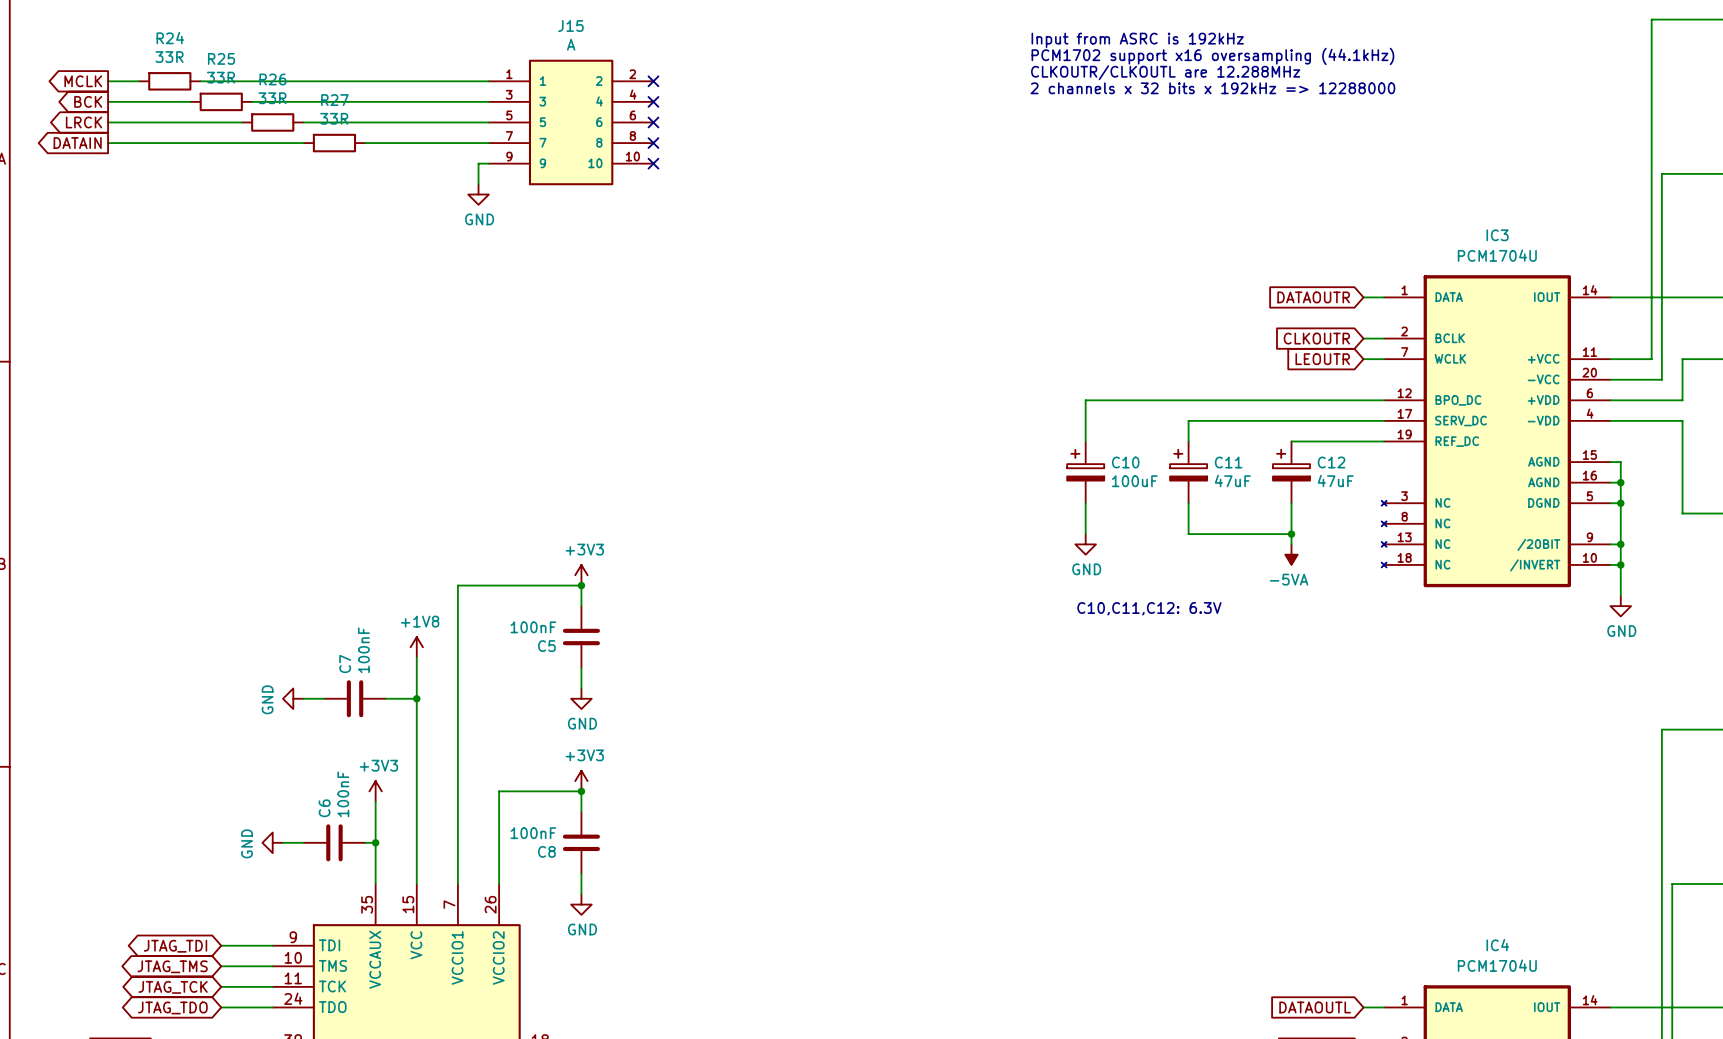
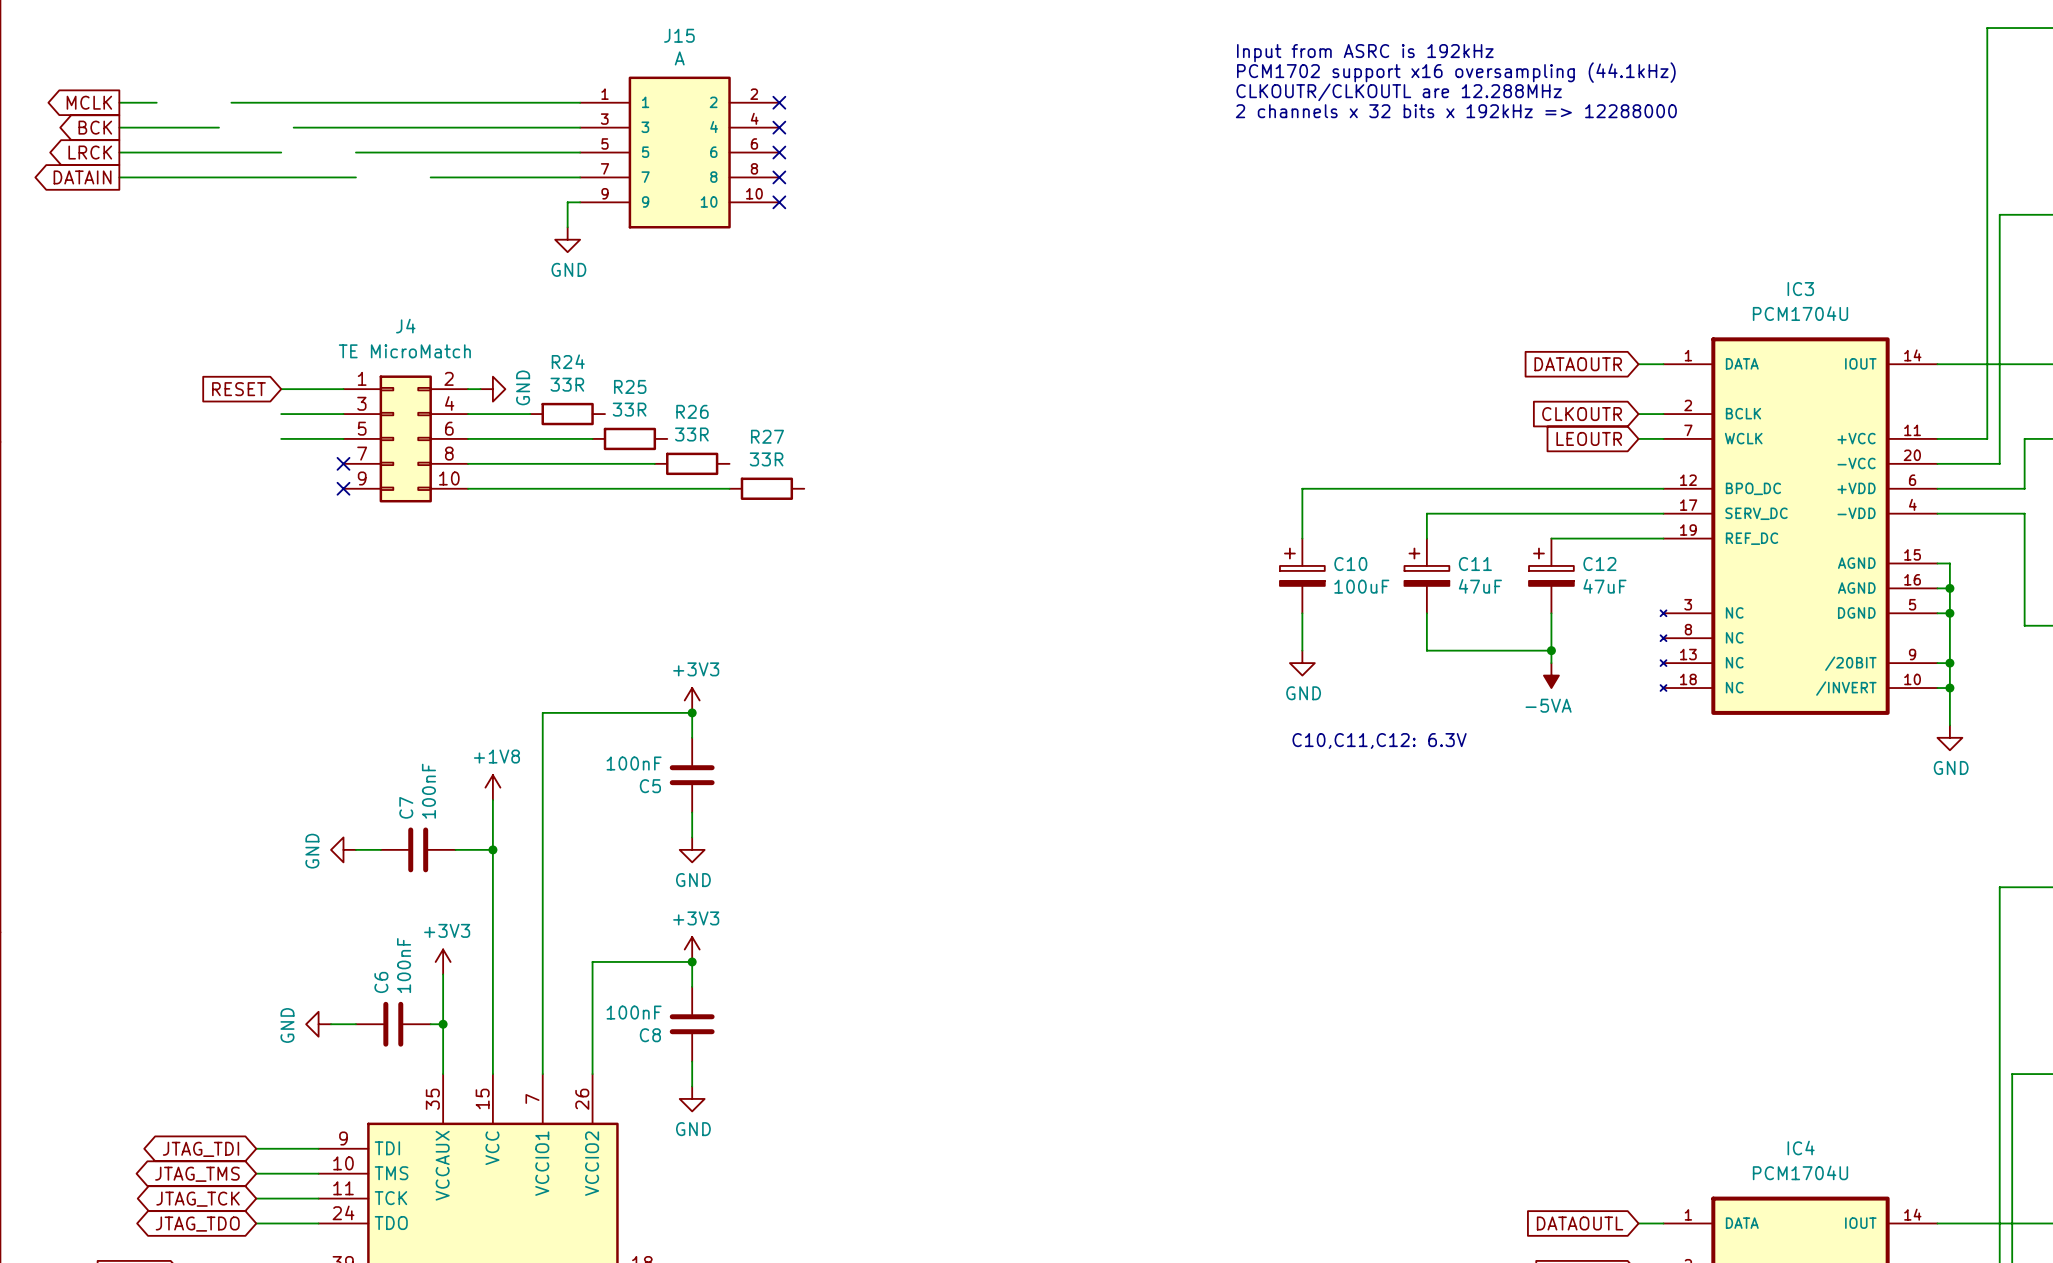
R24 position: (169, 81) -> (567, 414)
R25 position: (221, 101) -> (629, 438)
R26 position: (272, 122) -> (692, 463)
R27 position: (334, 143) -> (766, 488)
global label: none -> RESET (238, 389)
wire: none -> (281, 389) (343, 389)
wire: none -> (468, 389) (480, 389)
power symbol: none -> GND (492, 389)
wire: none -> (281, 414) (343, 414)
wire: none -> (468, 414) (530, 414)
wire: none -> (281, 438) (343, 438)
J4: none -> TE MicroMatch (405, 438)
wire: none -> (468, 438) (592, 438)
no-connect mark: none -> (343, 463)
wire: none -> (468, 463) (654, 463)
no-connect mark: none -> (343, 488)
wire: none -> (468, 488) (729, 488)

